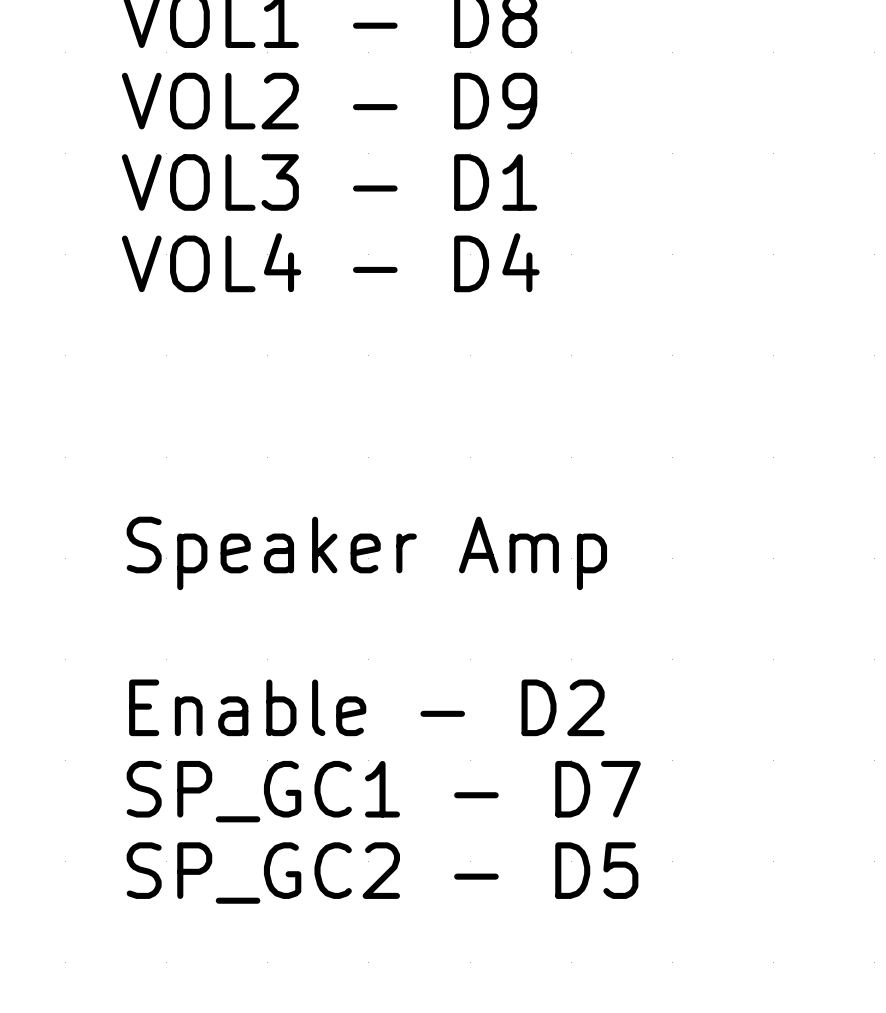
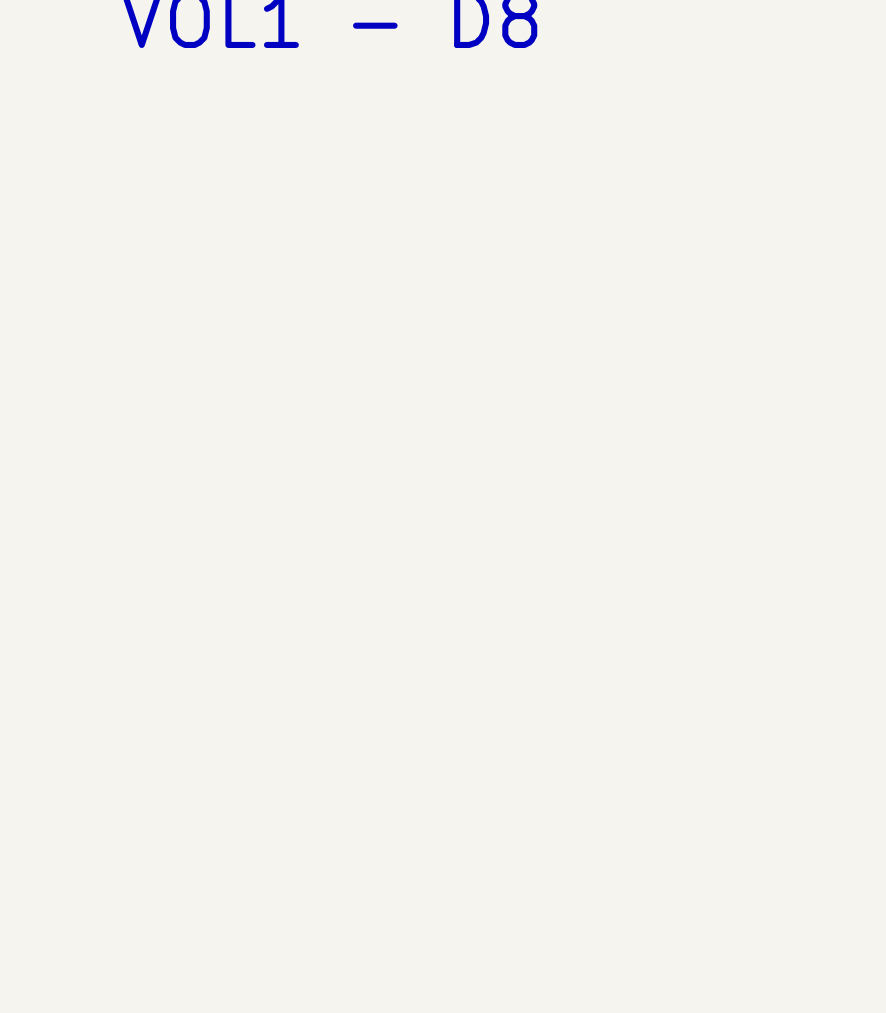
text: VOL2 - D9 (329, 101) -> none
text: VOL3 - D1 (329, 182) -> none
text: VOL4 - D4 (330, 262) -> none
text: Speaker Amp (366, 553) -> none
text: Enable - D2 (366, 707) -> none
text: SP_GC1 - D7 (383, 791) -> none
text: SP_GC2 - D5 (382, 873) -> none

